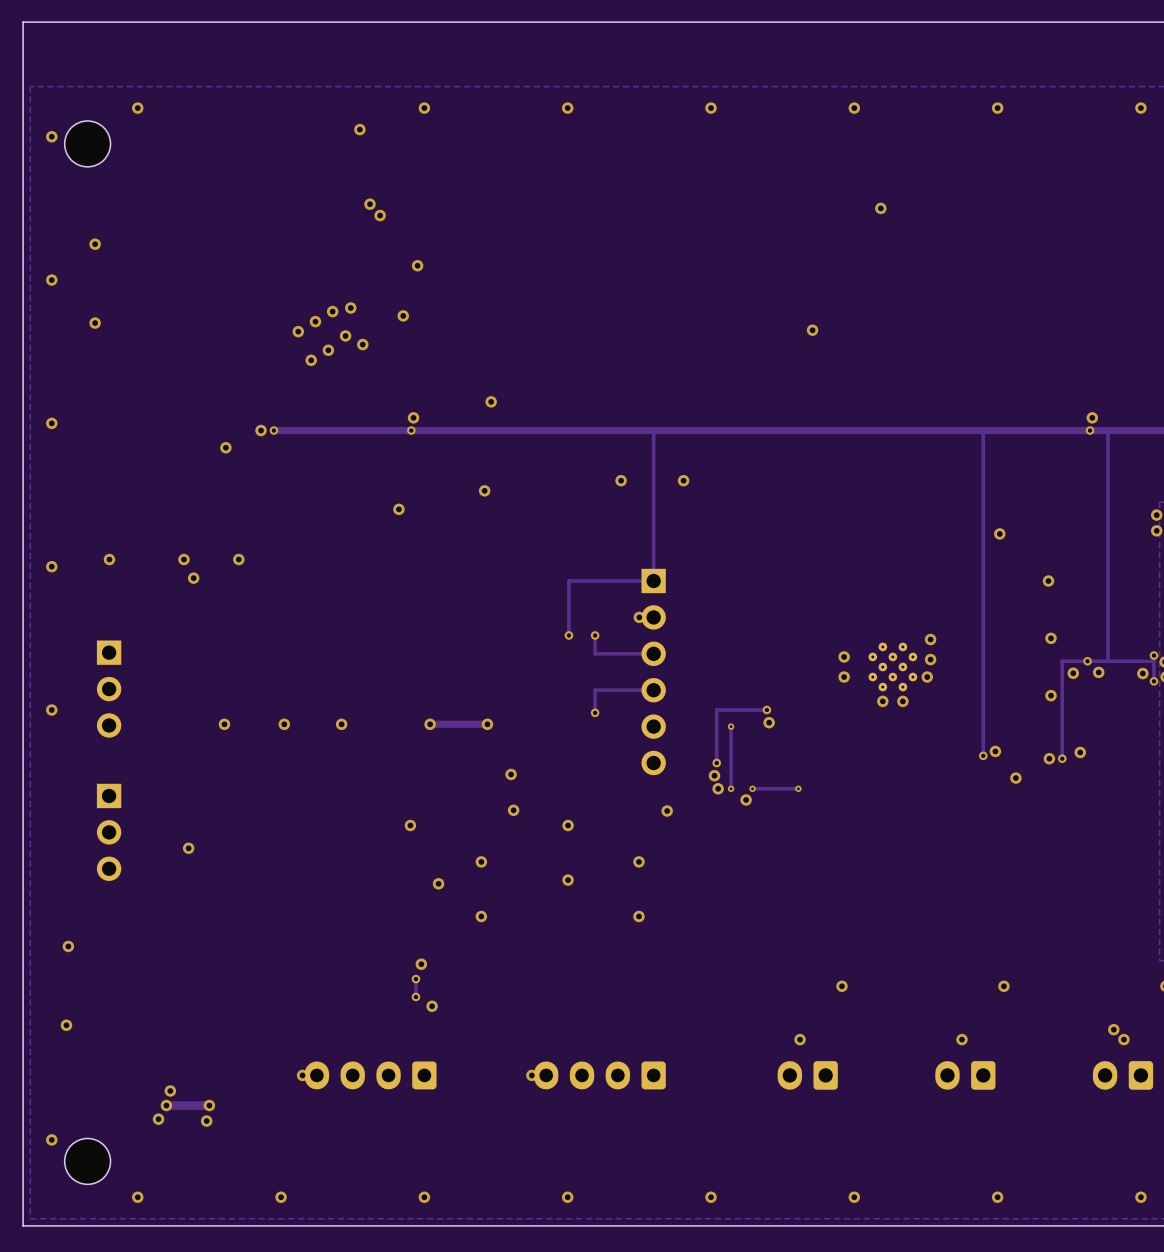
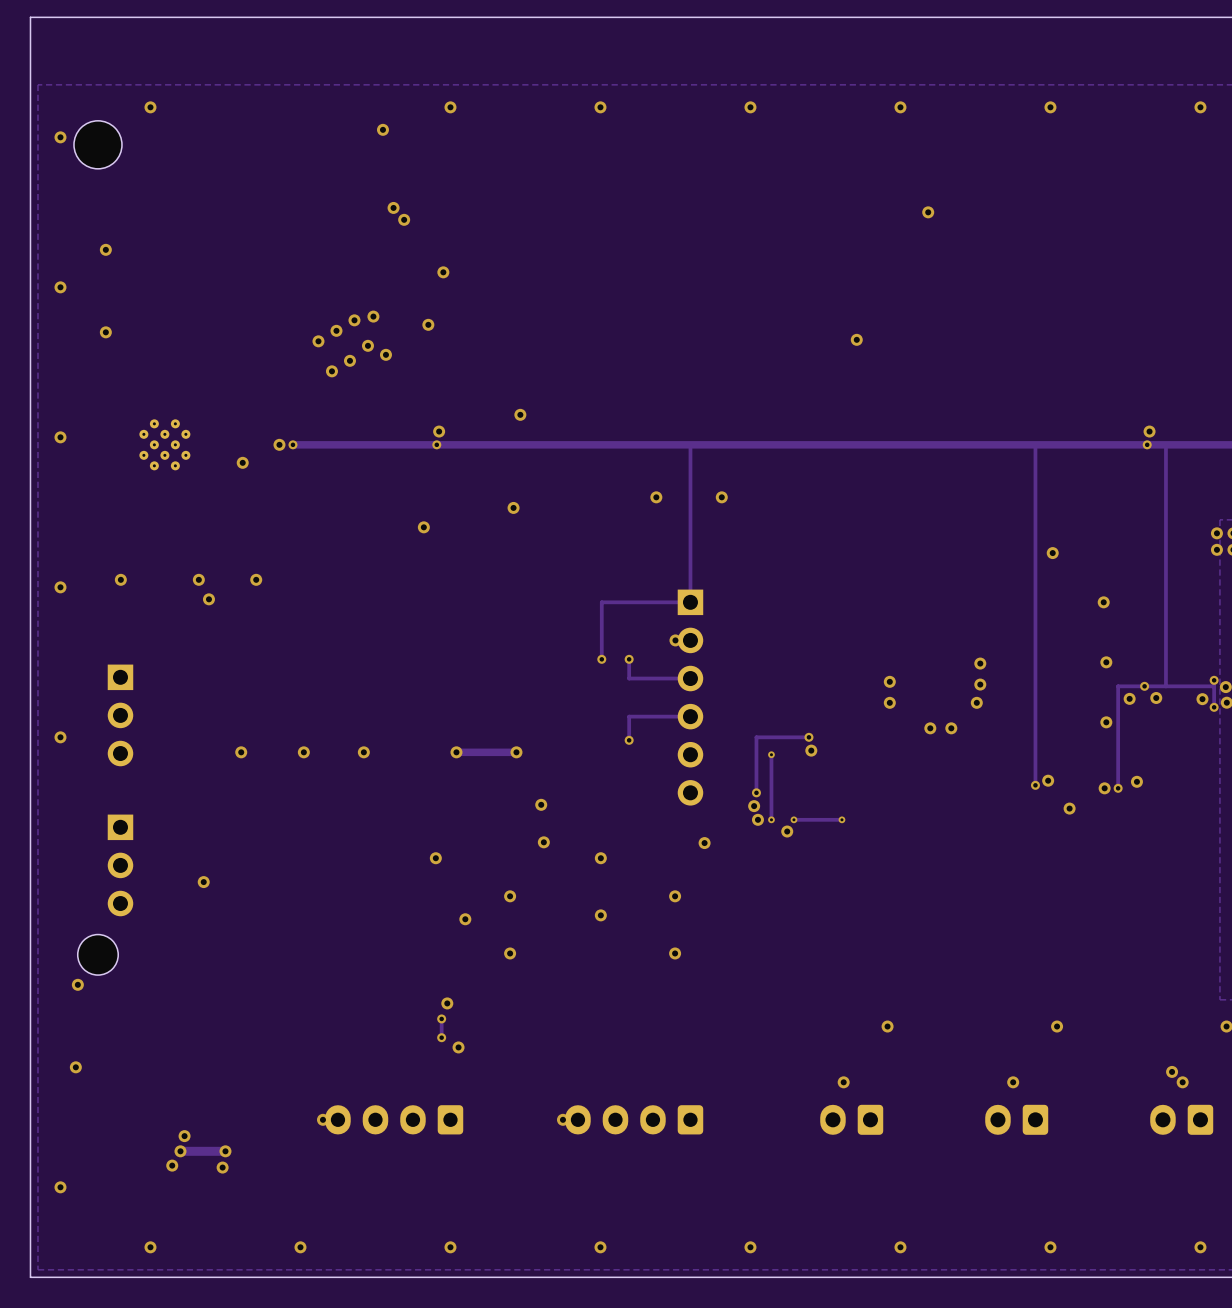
part: none -> (164, 444)
part: (892, 666) -> none
part: none -> (97, 954)
part: (87, 1161) -> none

